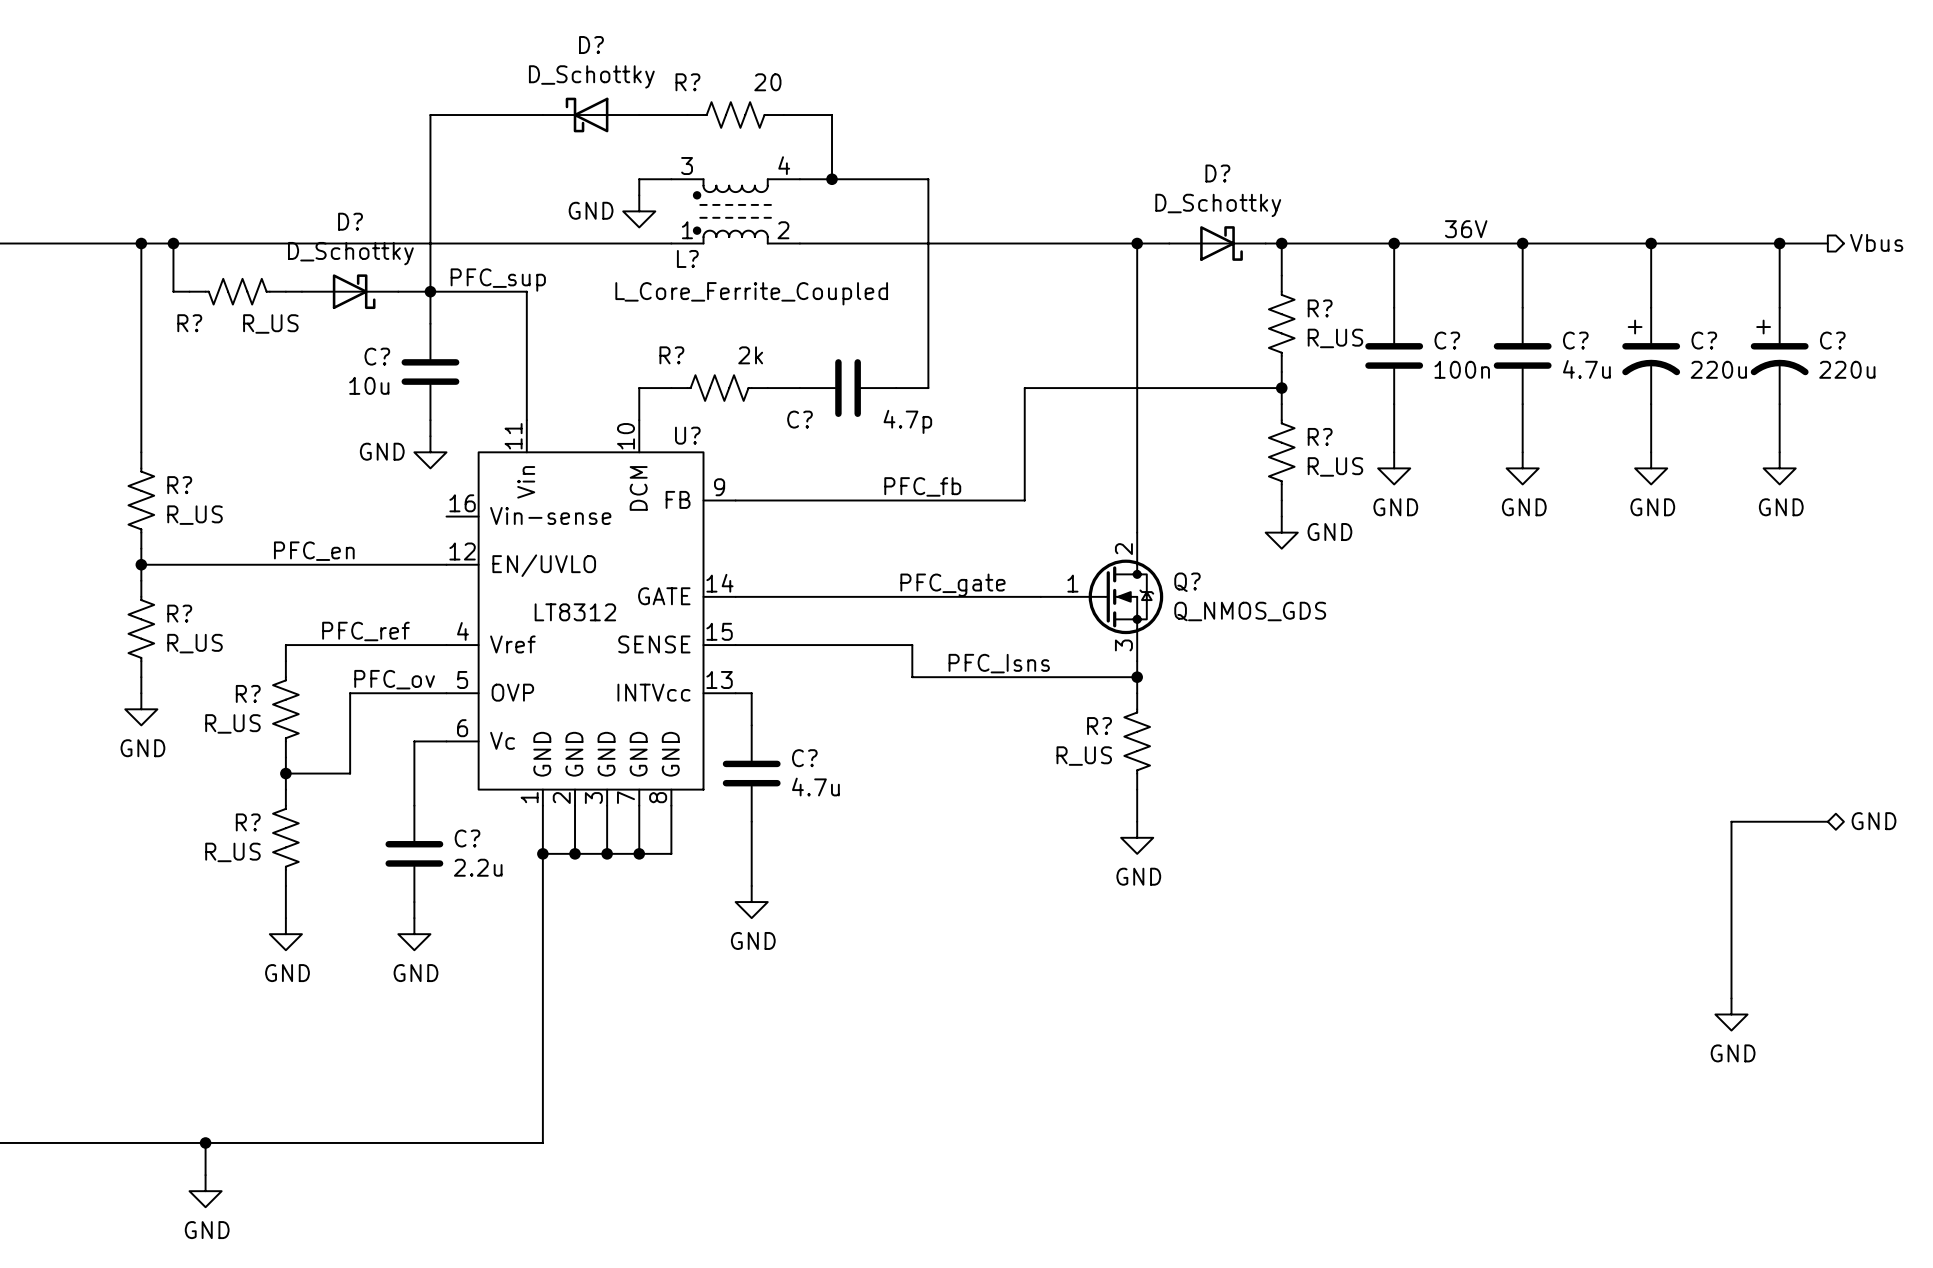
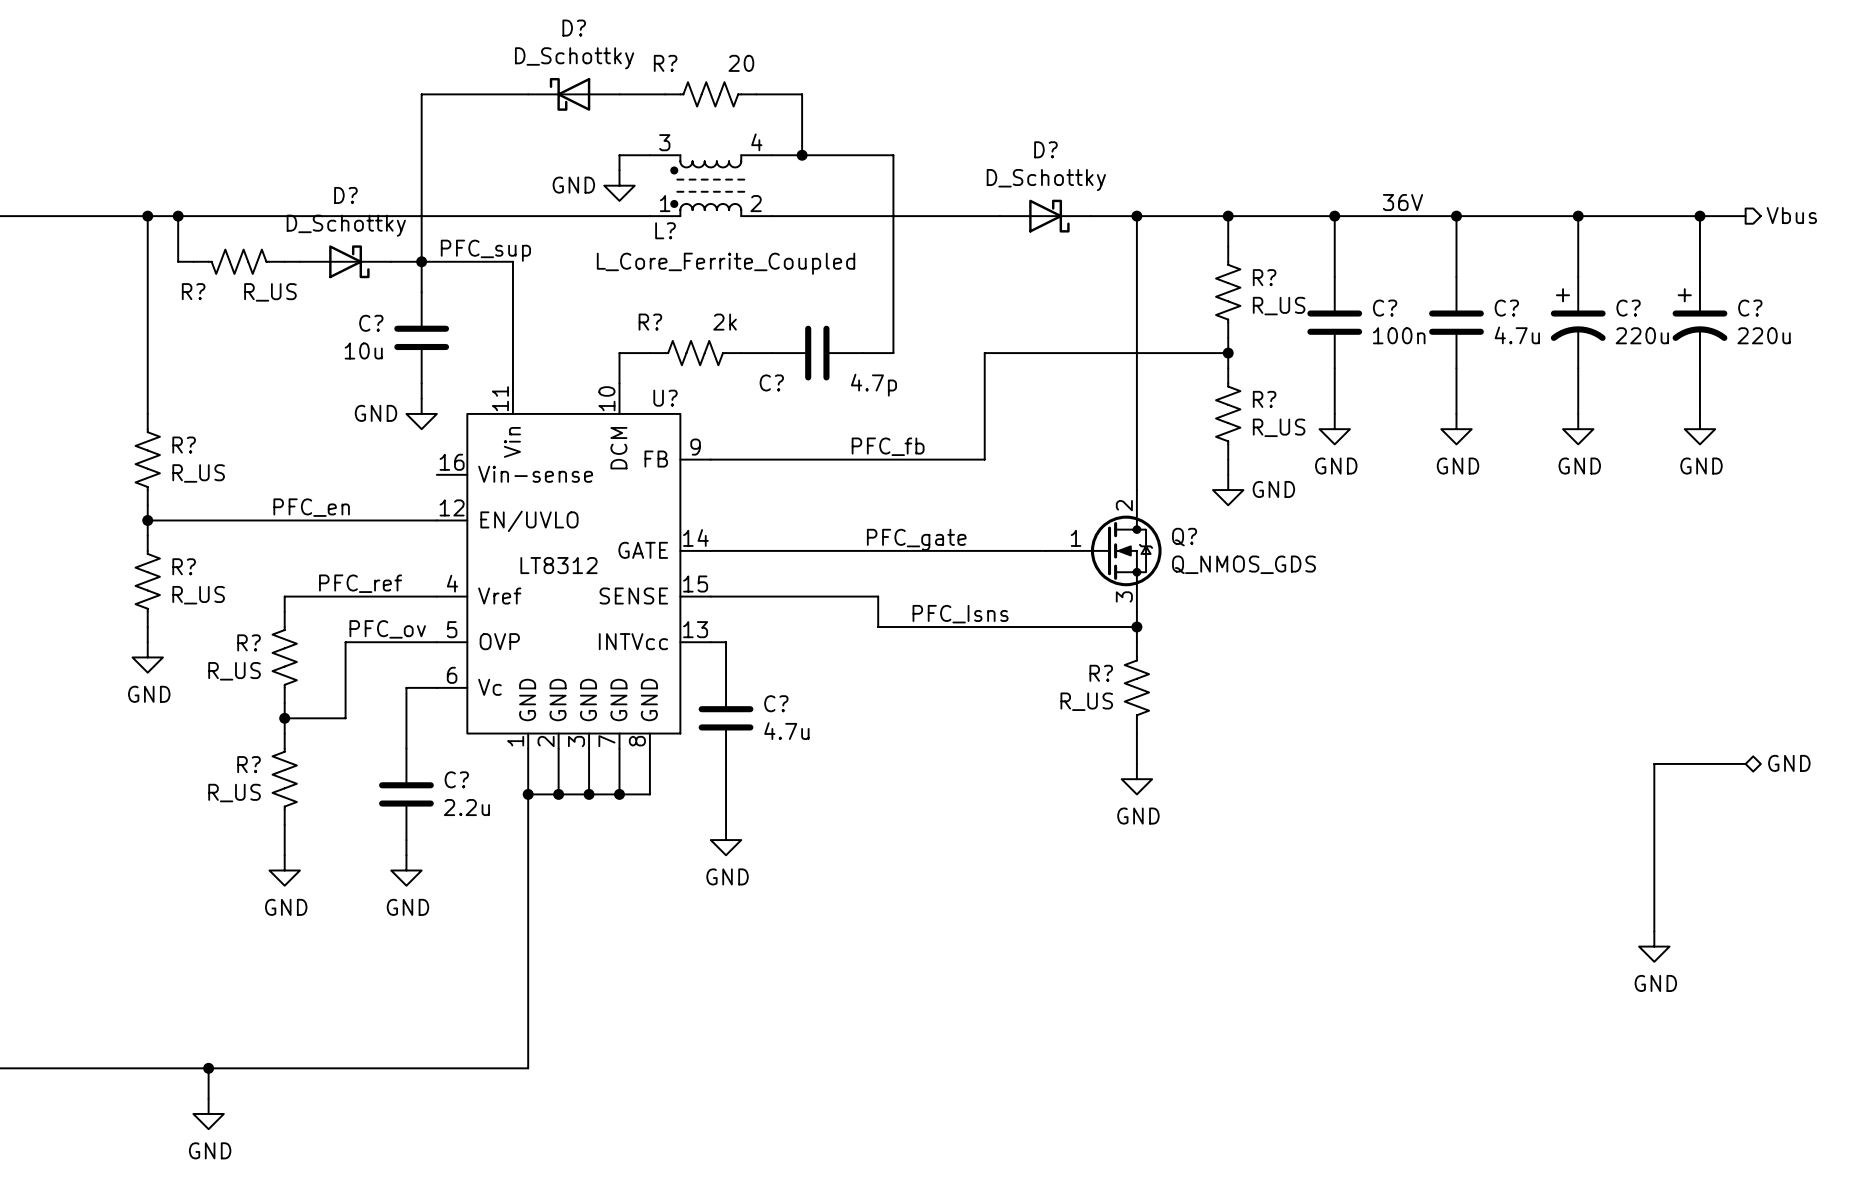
wire: (1040, 243) (1137, 243) (1137, 532) -> none
junction position: (1137, 243) -> (1136, 216)
wire: none -> (1136, 216) (1136, 490)
D? position: (1217, 243) -> (1045, 216)
Q? position: (1102, 596) -> (1103, 550)
wire: (1137, 661) (1137, 693) -> (1136, 611) (1136, 642)
wire: none -> (1091, 627) (1136, 627)
junction position: (1137, 677) -> (1136, 627)
R? position: (1137, 741) -> (1136, 687)
wire: (1137, 789) (1137, 821) -> (1136, 733) (1136, 763)
power symbol position: GND (1137, 837) -> GND (1136, 779)

